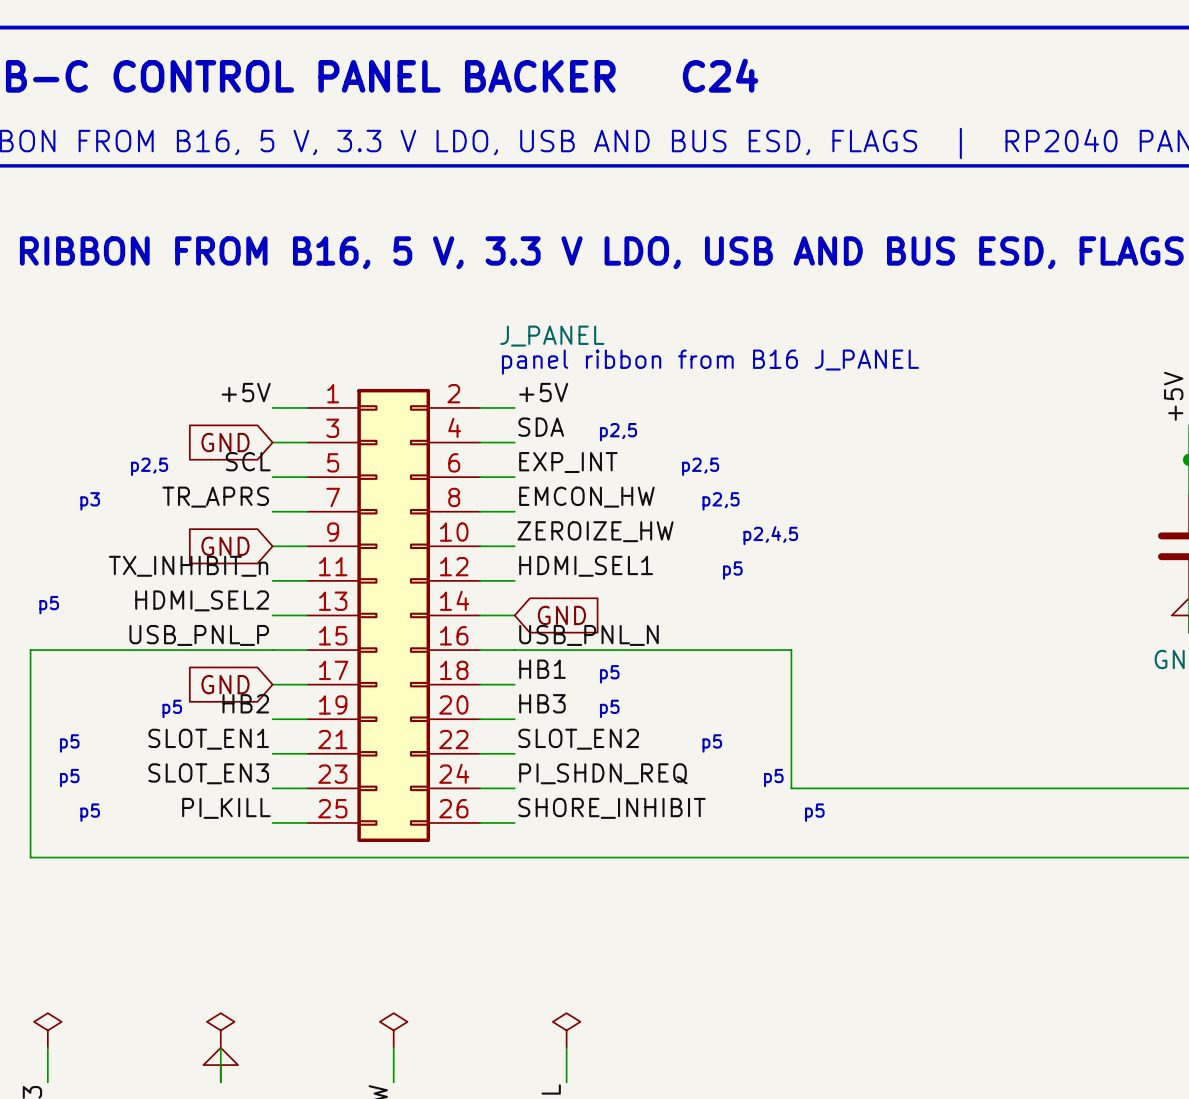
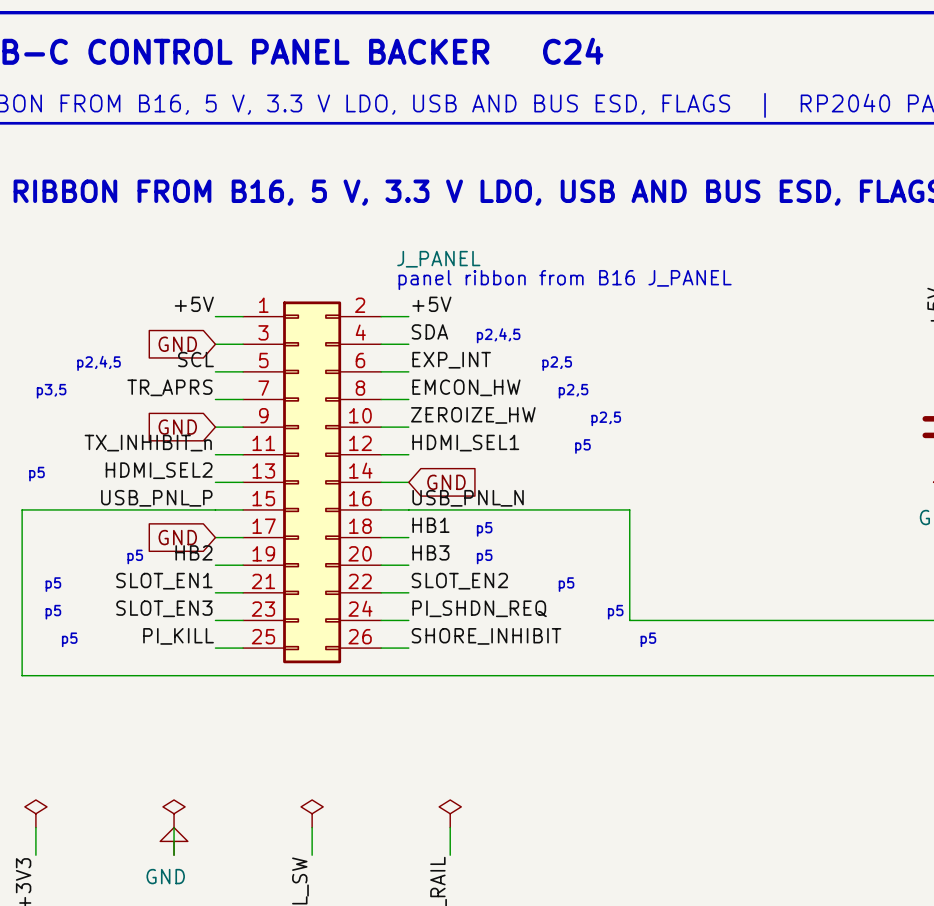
text: p2,5 (618, 432) -> p2,4,5 (498, 335)
text: p2,5 (149, 466) -> p2,4,5 (99, 363)
text: p3 (90, 501) -> p3,5 (51, 391)
text: p2,4,5 (770, 535) -> p2,5 (606, 418)

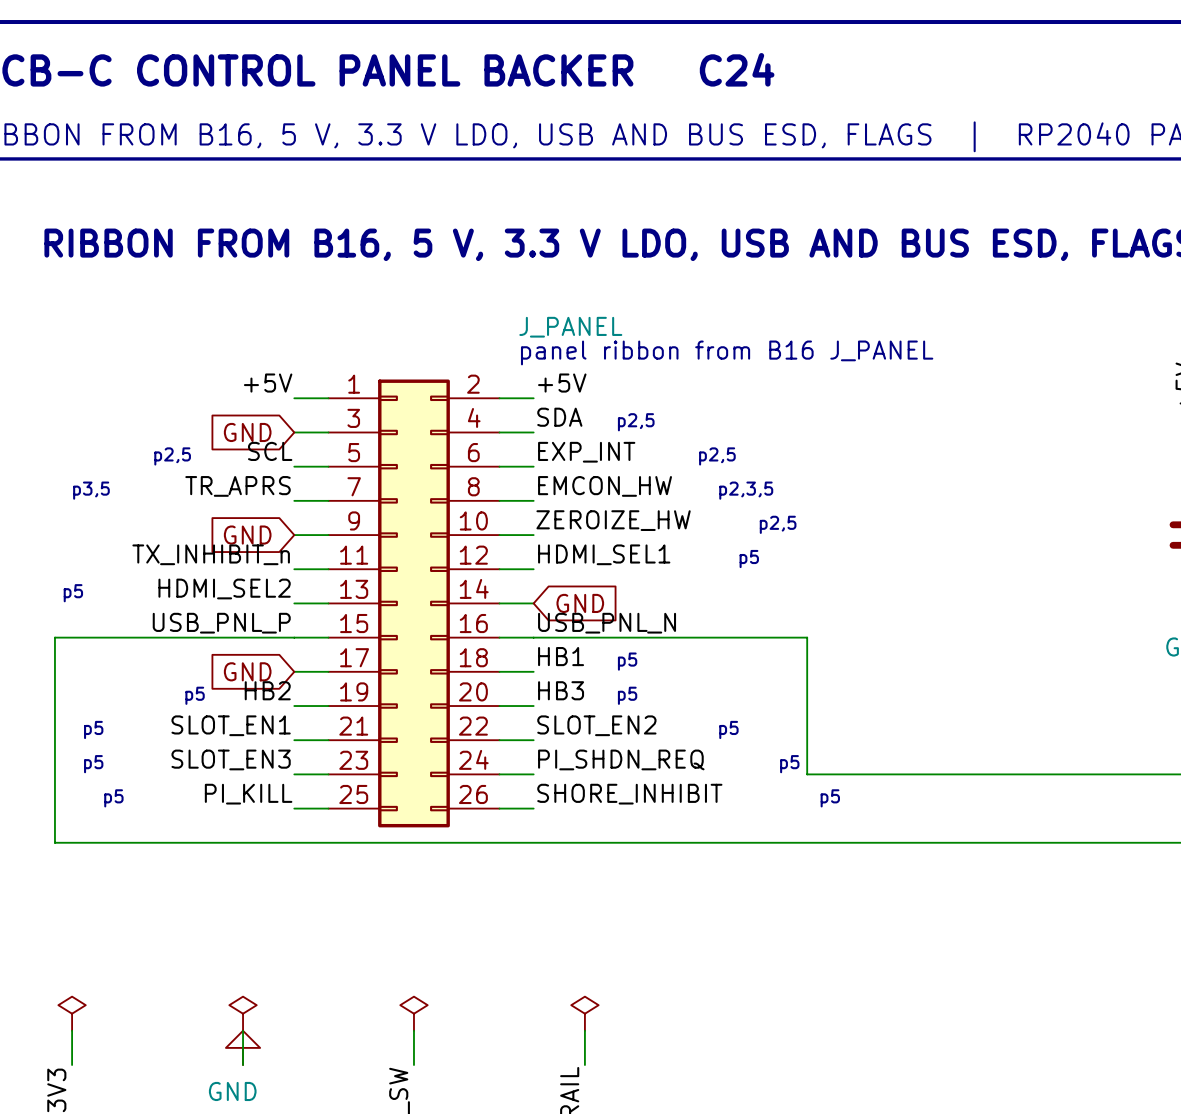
text: p2,4,5 (498, 335) -> p2,5 (636, 422)
text: p2,4,5 (99, 363) -> p2,5 (172, 456)
text: p2,5 (573, 391) -> p2,3,5 (746, 490)

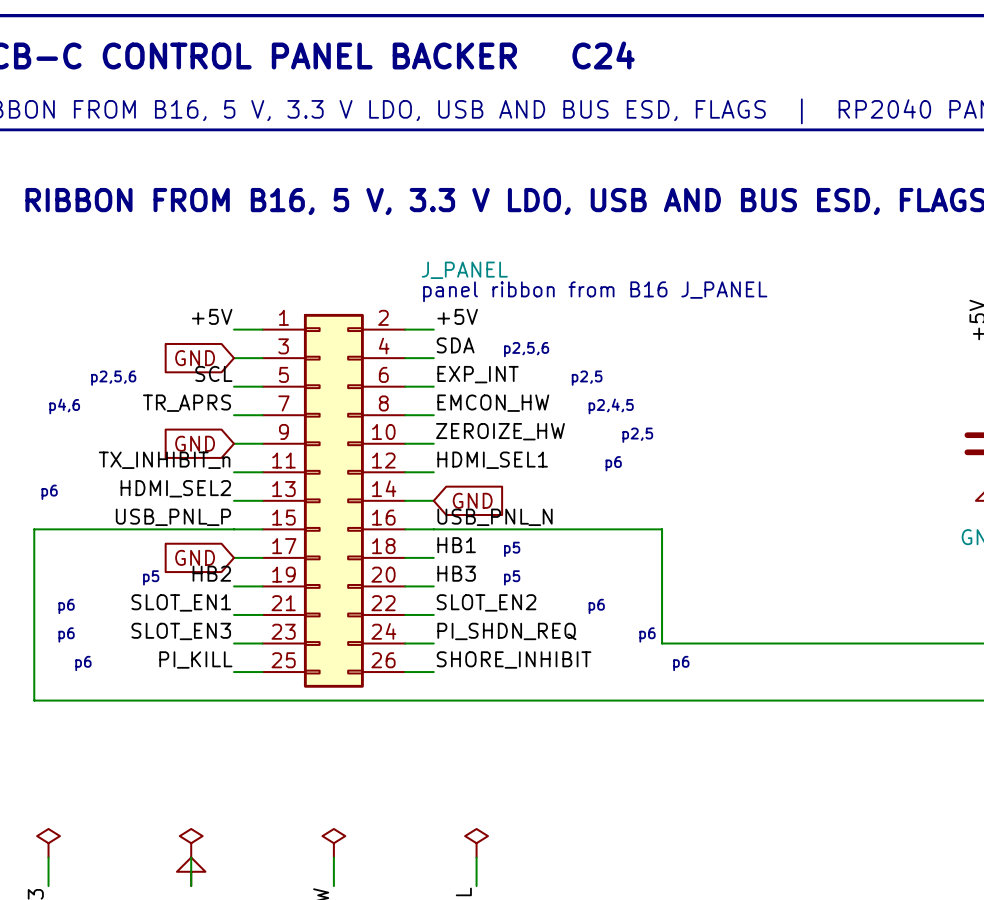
text: p2,5 (636, 422) -> p2,5,6 (526, 349)
text: p2,5 (172, 456) -> p2,5,6 (113, 378)
text: p3,5 (91, 490) -> p4,6 (64, 406)
text: p2,3,5 (746, 490) -> p2,4,5 (611, 406)
text: p5 (749, 559) -> p6 (613, 463)
text: p5 (73, 593) -> p6 (49, 492)
text: p5 (93, 729) -> p6 (66, 606)
text: p5 (728, 729) -> p6 (596, 606)
text: p5 (93, 764) -> p6 (66, 634)
text: p5 (789, 764) -> p6 (647, 634)
text: p5 (113, 798) -> p6 (83, 663)
text: p5 (830, 798) -> p6 (681, 663)

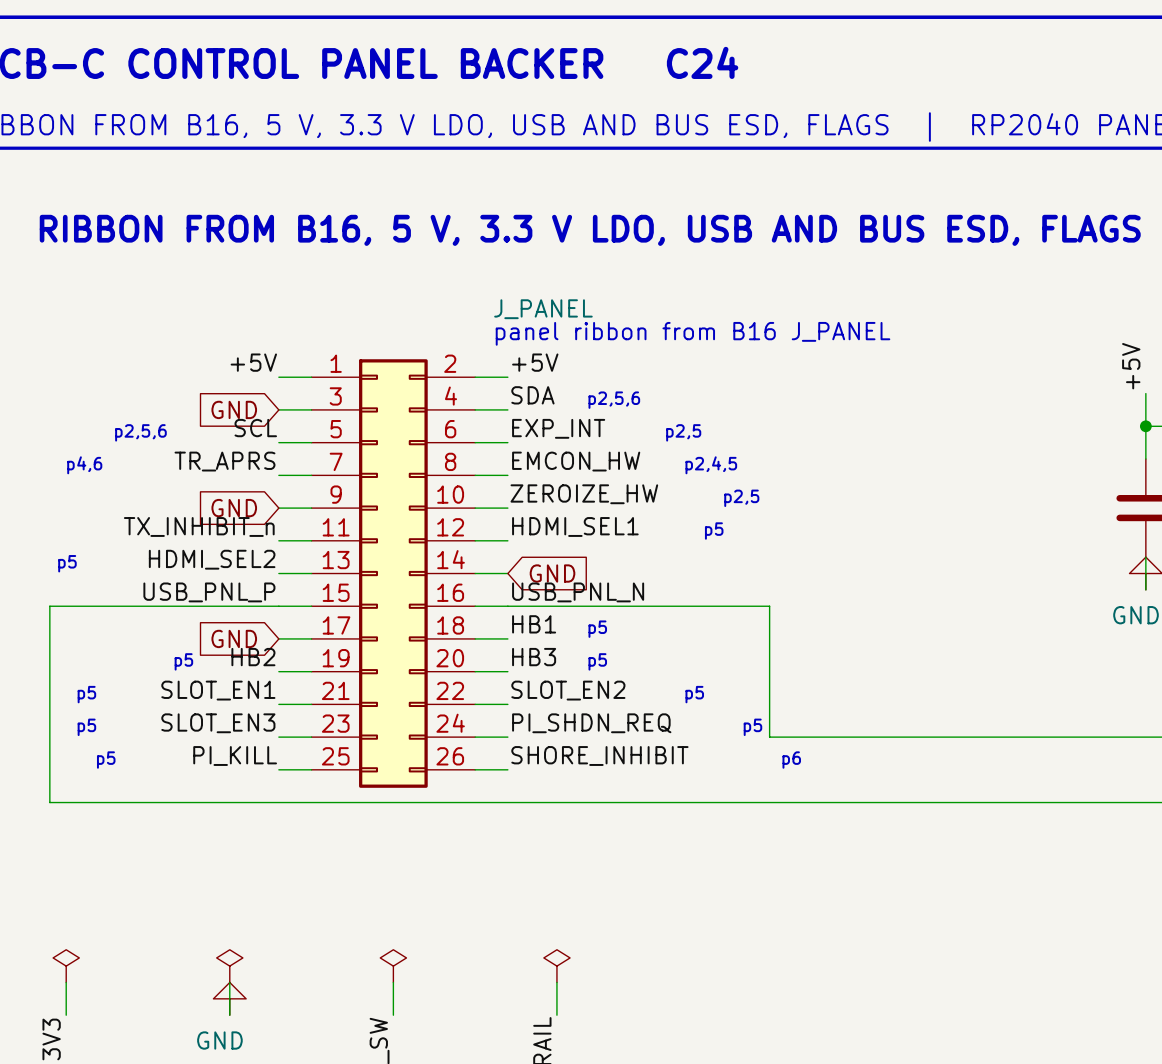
text: p6 (613, 463) -> p5 (714, 531)
text: p6 (49, 492) -> p5 (67, 563)
text: p6 (66, 606) -> p5 (86, 694)
text: p6 (596, 606) -> p5 (694, 694)
text: p6 (66, 634) -> p5 (86, 727)
text: p6 (647, 634) -> p5 (752, 727)
text: p6 (83, 663) -> p5 (106, 760)

